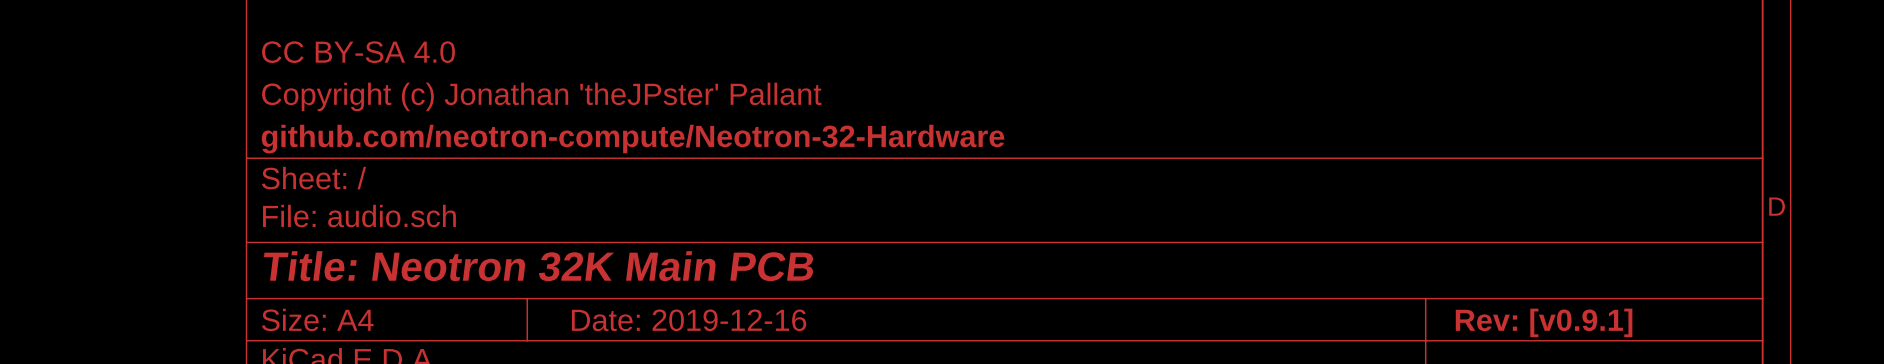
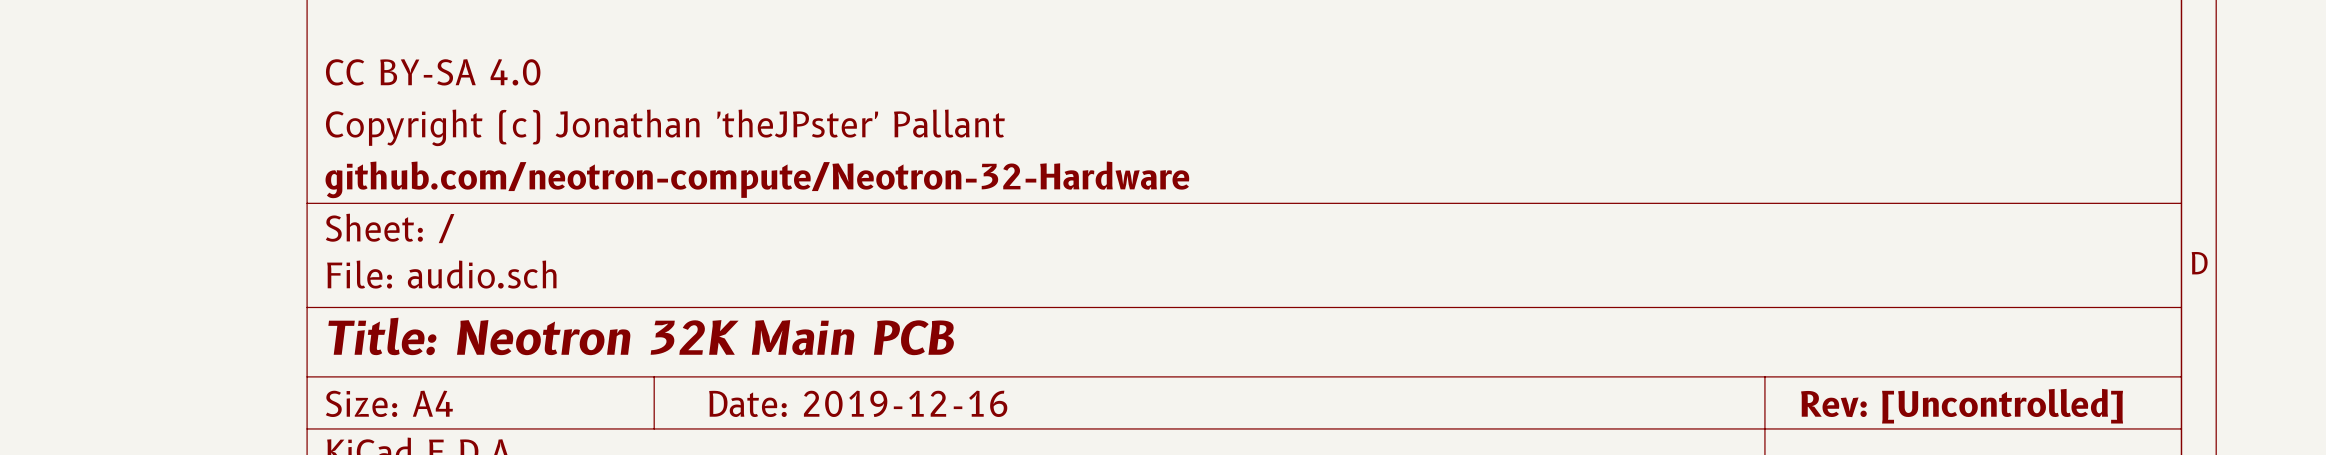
title block: Rev: [v0.9.1] (1544, 322) -> Rev: [Uncontrolled] (1962, 406)

